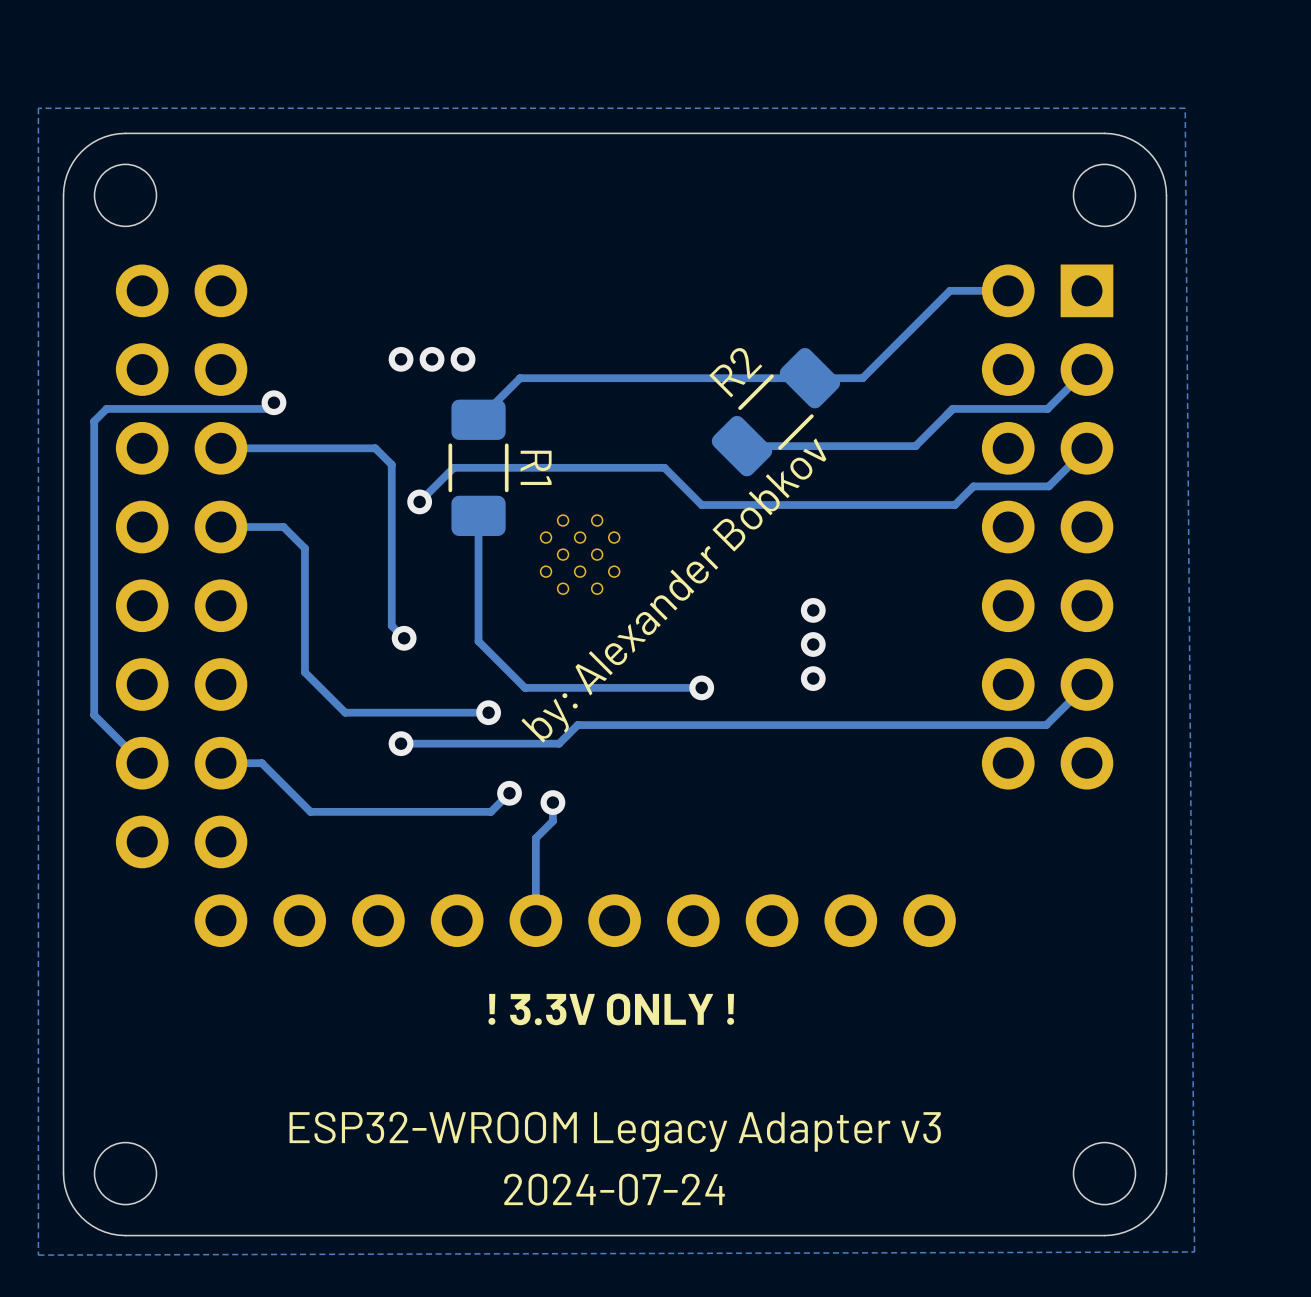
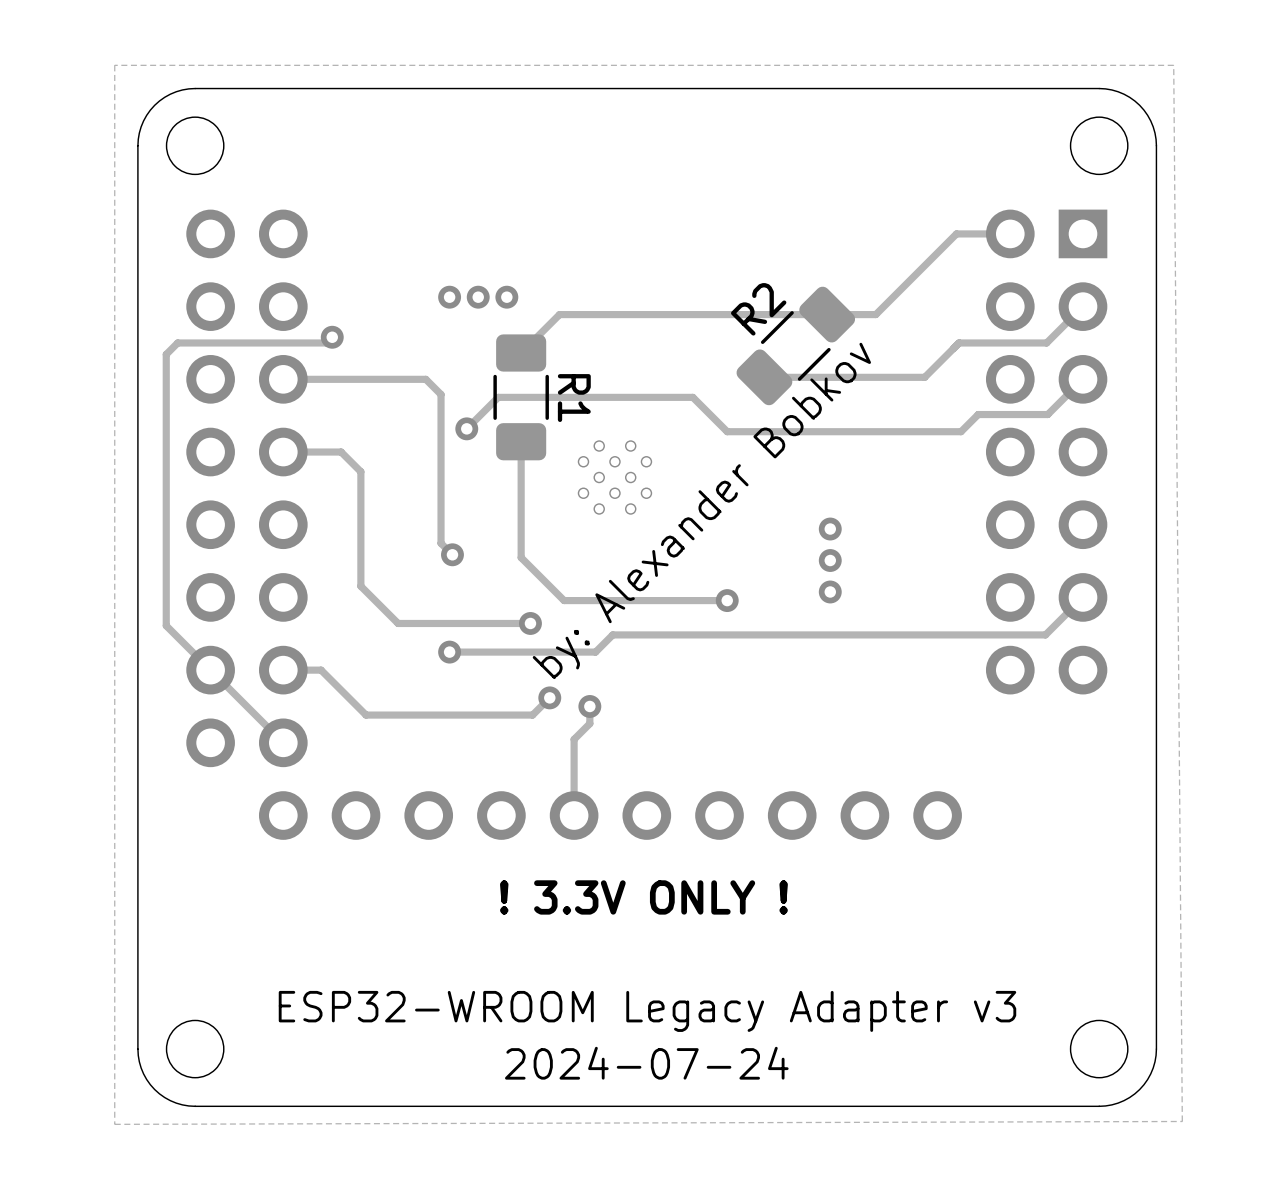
track: none -> (210, 670) (283, 742)

